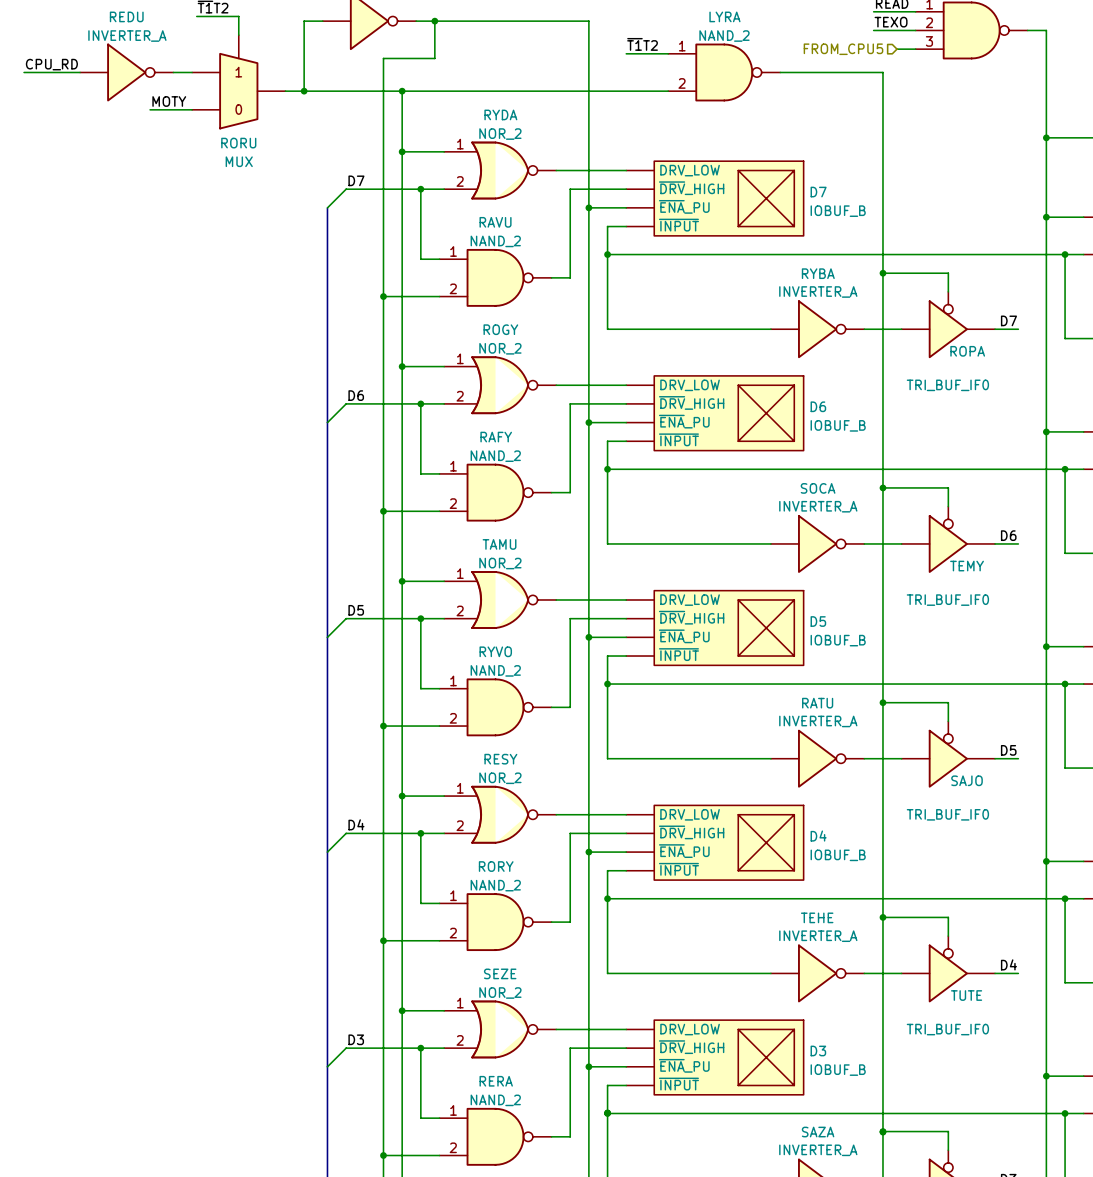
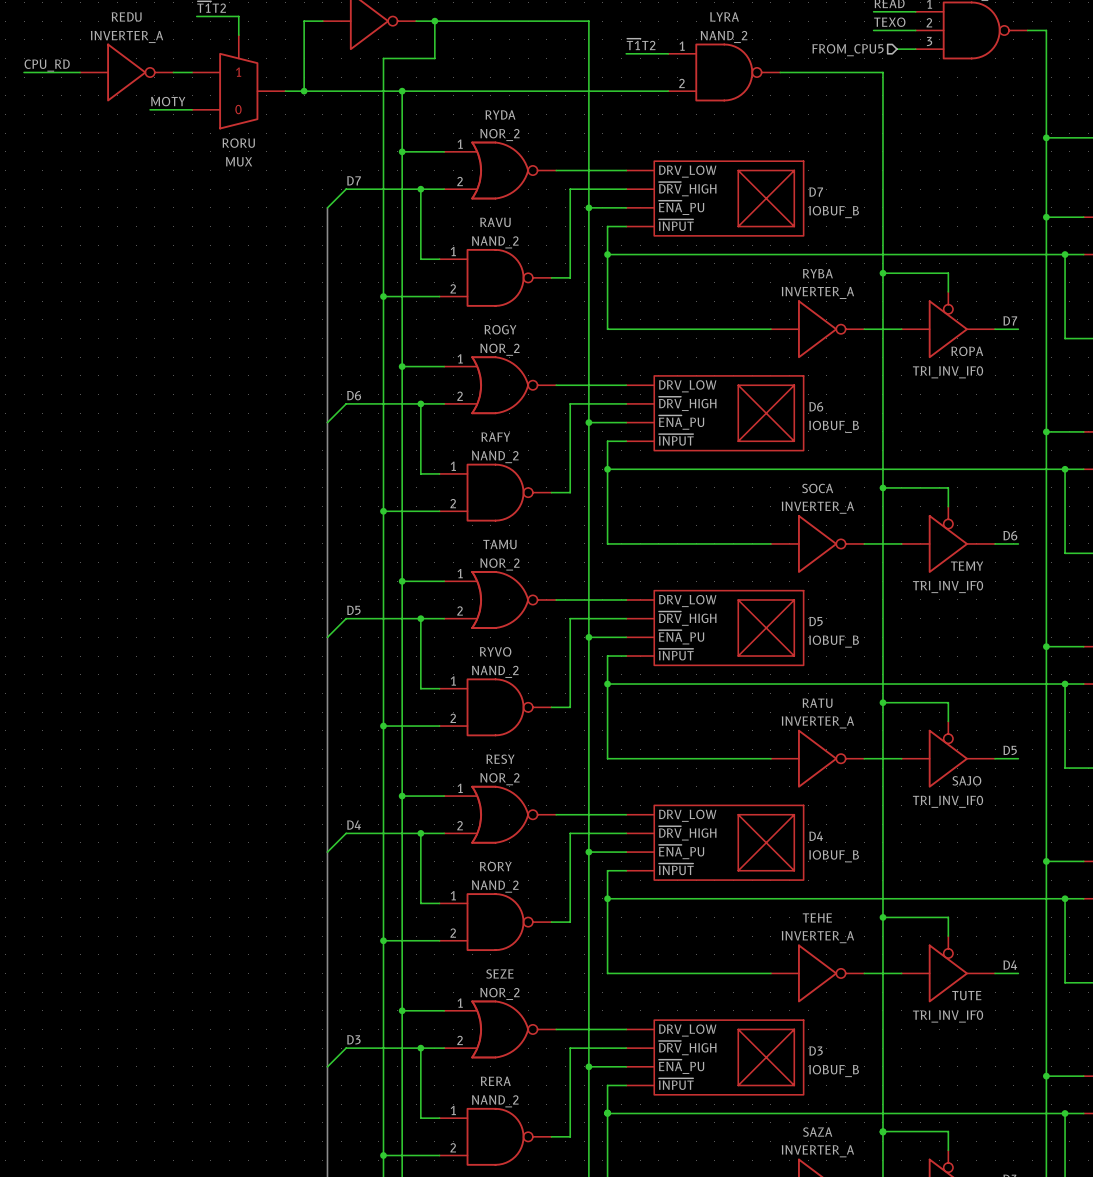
ROPA value: TRI_BUF_IF0 (947, 385) -> TRI_INV_IF0 (948, 372)
TEMY value: TRI_BUF_IF0 (947, 600) -> TRI_INV_IF0 (948, 587)
SAJO value: TRI_BUF_IF0 (947, 814) -> TRI_INV_IF0 (948, 801)
TUTE value: TRI_BUF_IF0 (947, 1029) -> TRI_INV_IF0 (948, 1016)

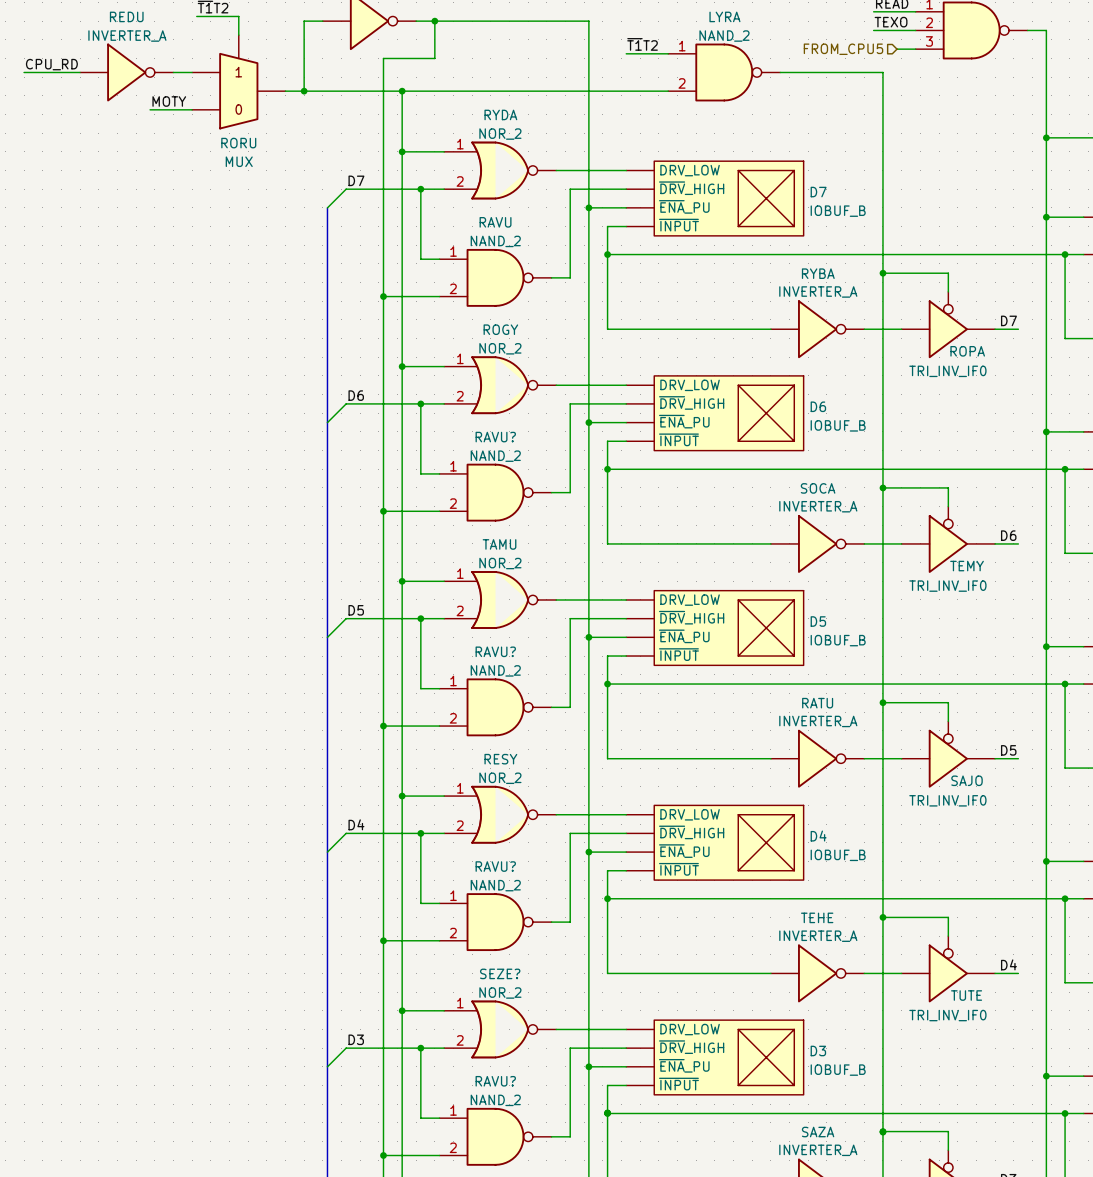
RAFY name: RAFY (495, 437) -> RAVU? (495, 437)
RYVO name: RYVO (495, 651) -> RAVU? (495, 651)
RORY name: RORY (495, 866) -> RAVU? (495, 866)
SEZE name: SEZE (499, 973) -> SEZE? (500, 973)
RERA name: RERA (495, 1081) -> RAVU? (495, 1081)

